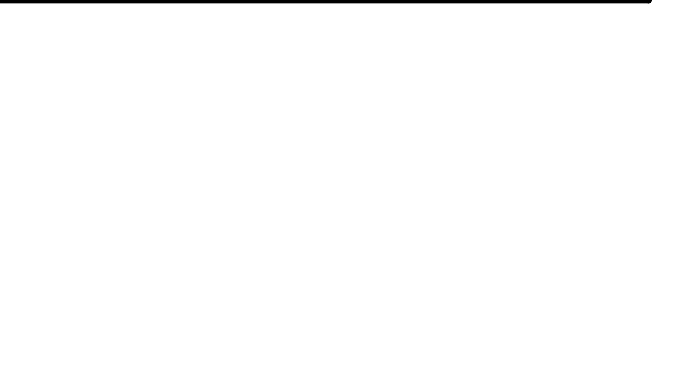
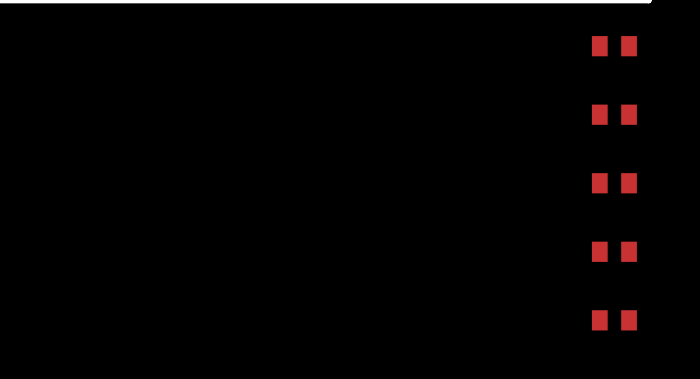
part: none -> (614, 46)
part: none -> (614, 114)
part: none -> (614, 183)
part: none -> (614, 251)
part: none -> (614, 320)

